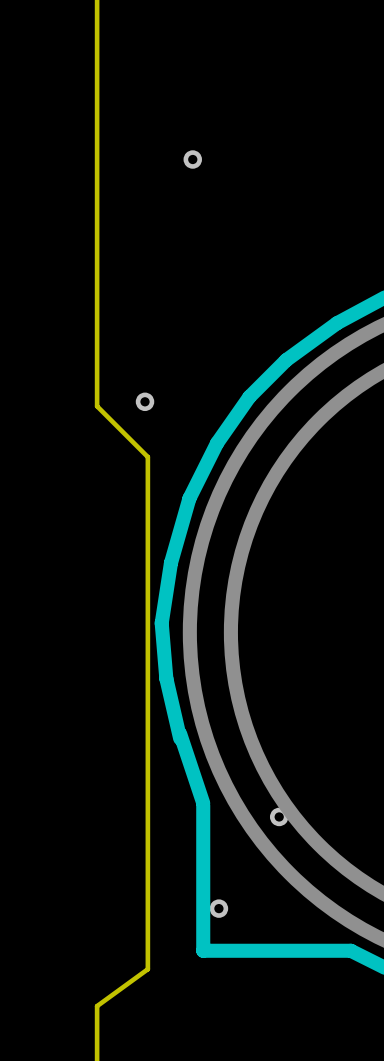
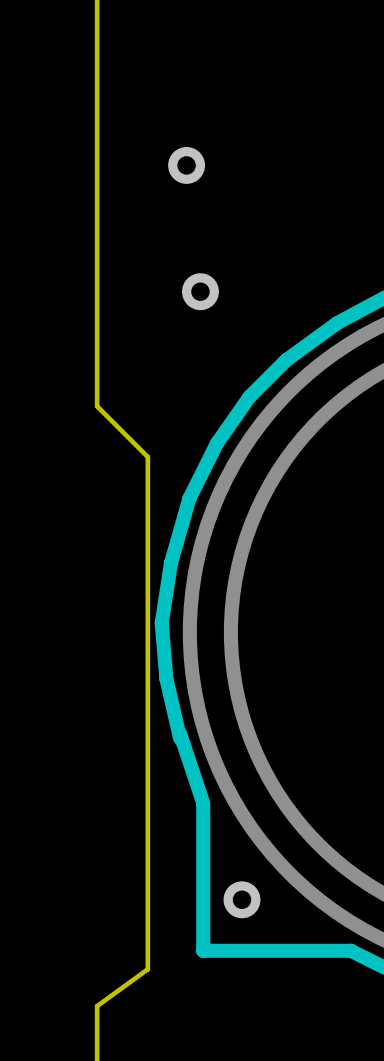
via size: [183, 150, 202, 169] -> [168, 146, 206, 184]
via: none -> (200, 291)
via: (145, 401) -> none
via: (279, 816) -> none
via size: [209, 899, 229, 918] -> [223, 881, 261, 919]

